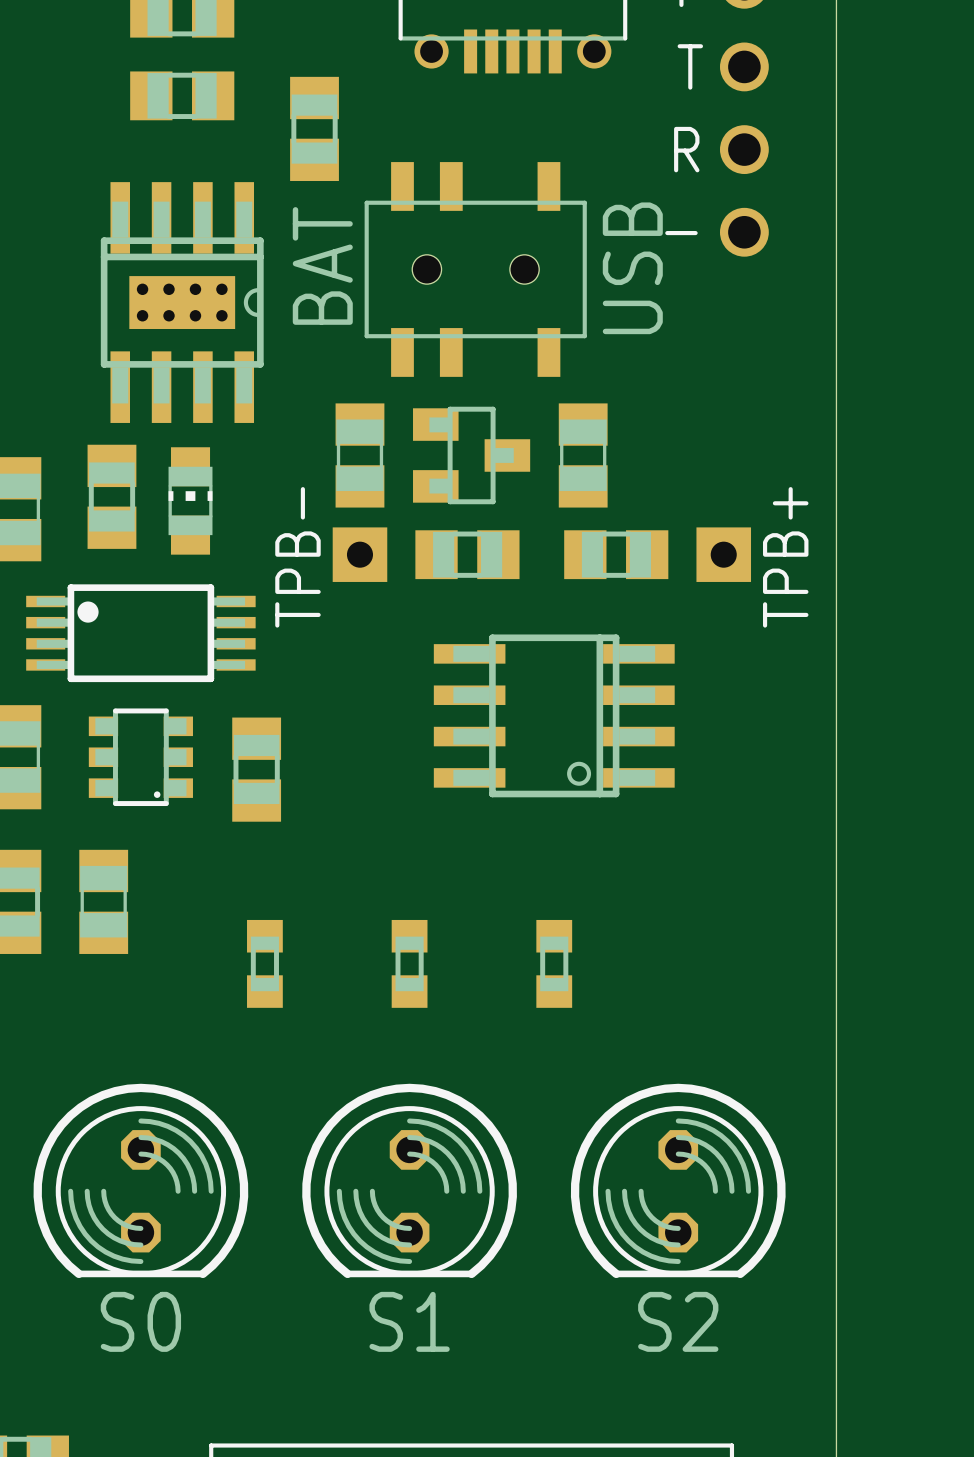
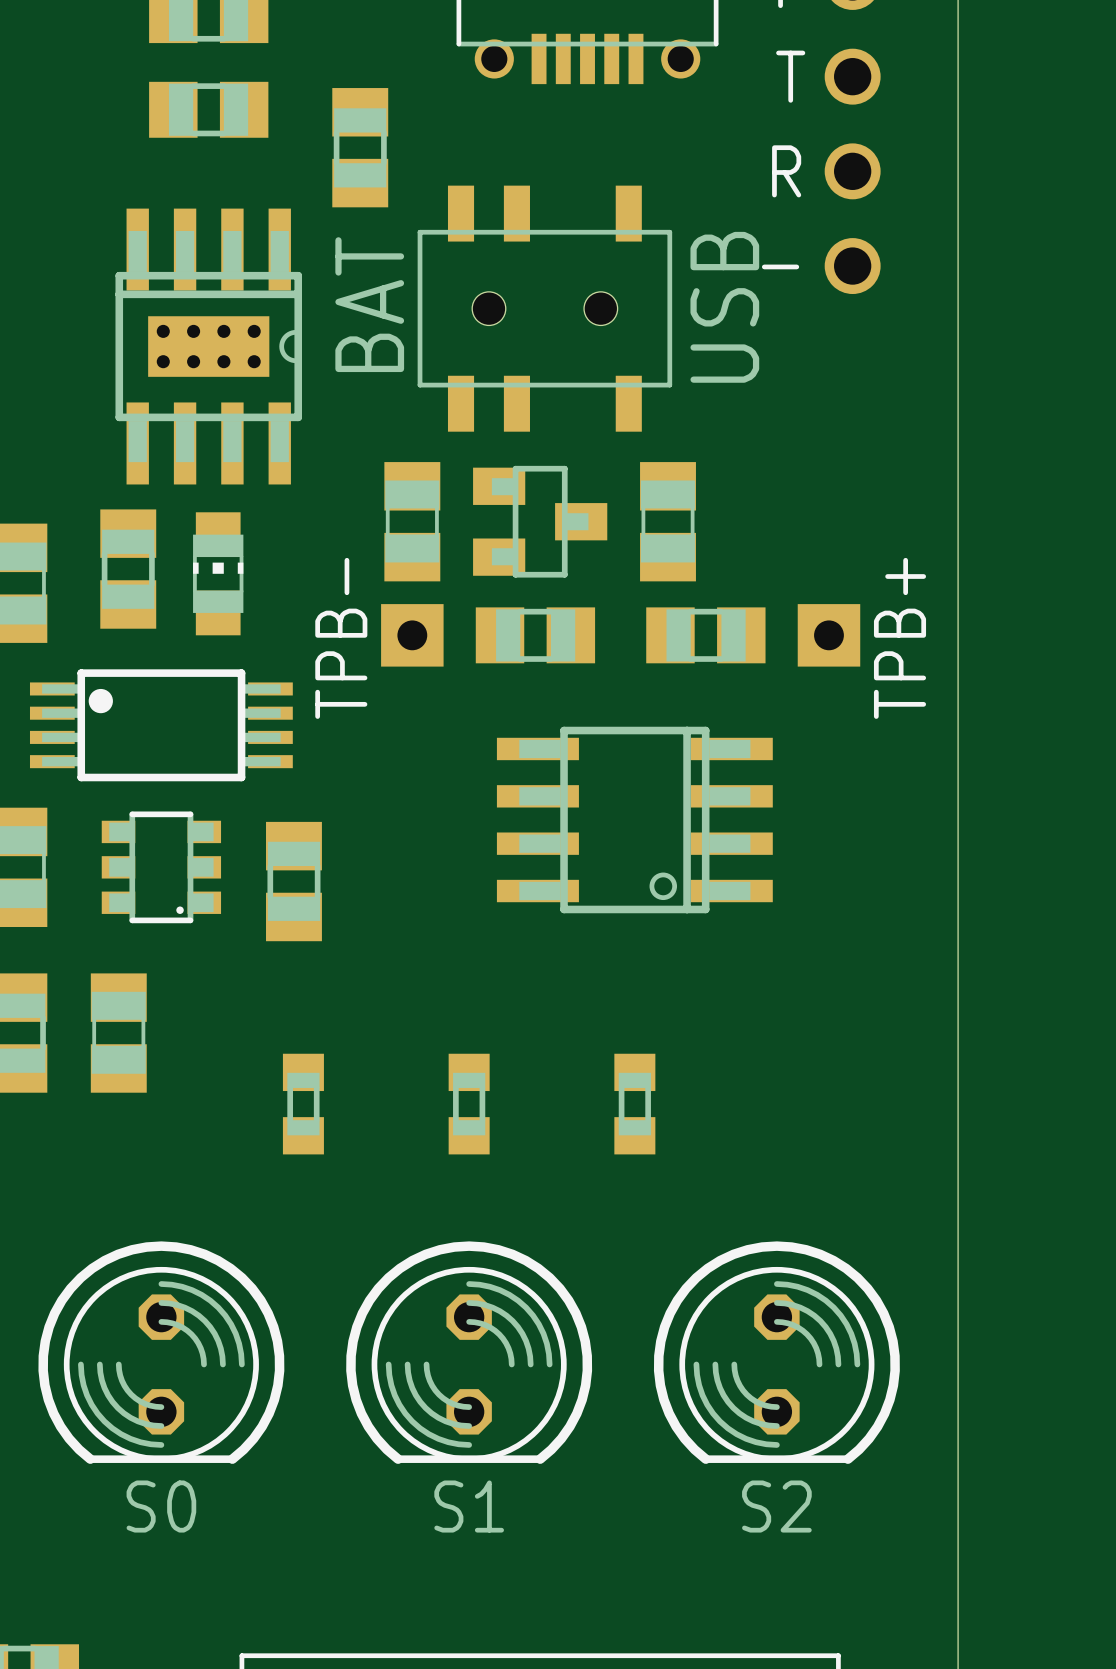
text: none -> S0 (161, 1506)
text: none -> S1 (469, 1506)
text: none -> S2 (776, 1506)
part value: S0 (140, 1321) -> none
part value: S1 (409, 1321) -> none
part value: S2 (678, 1321) -> none

